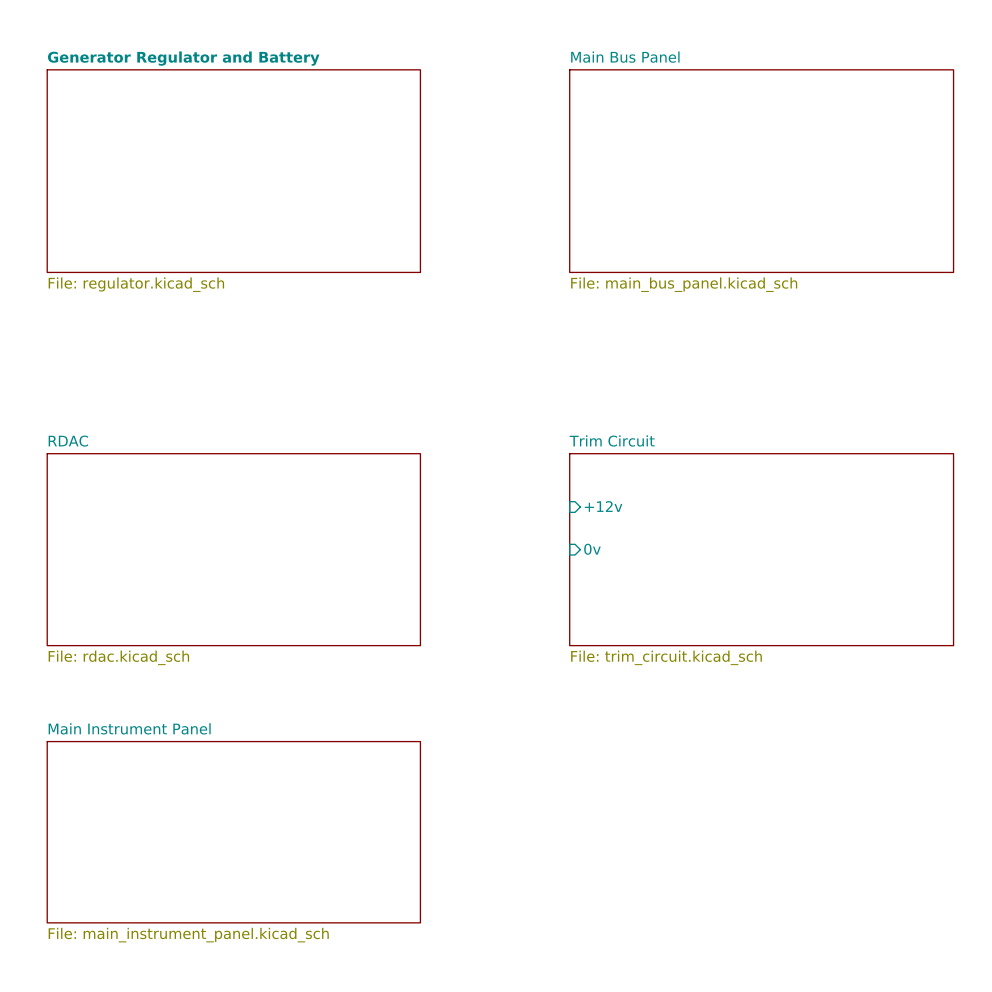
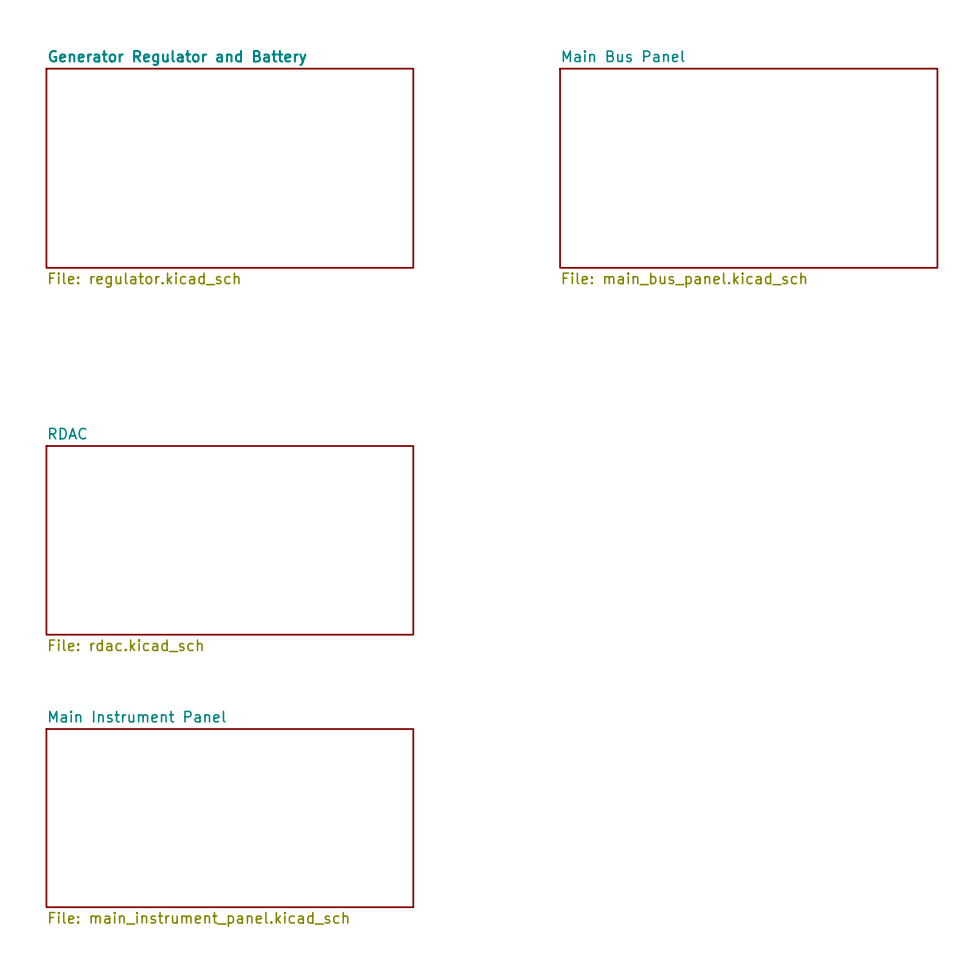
sheet pin: +12v (603, 506) -> none
sheet pin: 0v (592, 549) -> none
sheet Trim Circuit: File: trim_circuit.kicad_sch (761, 549) -> none

